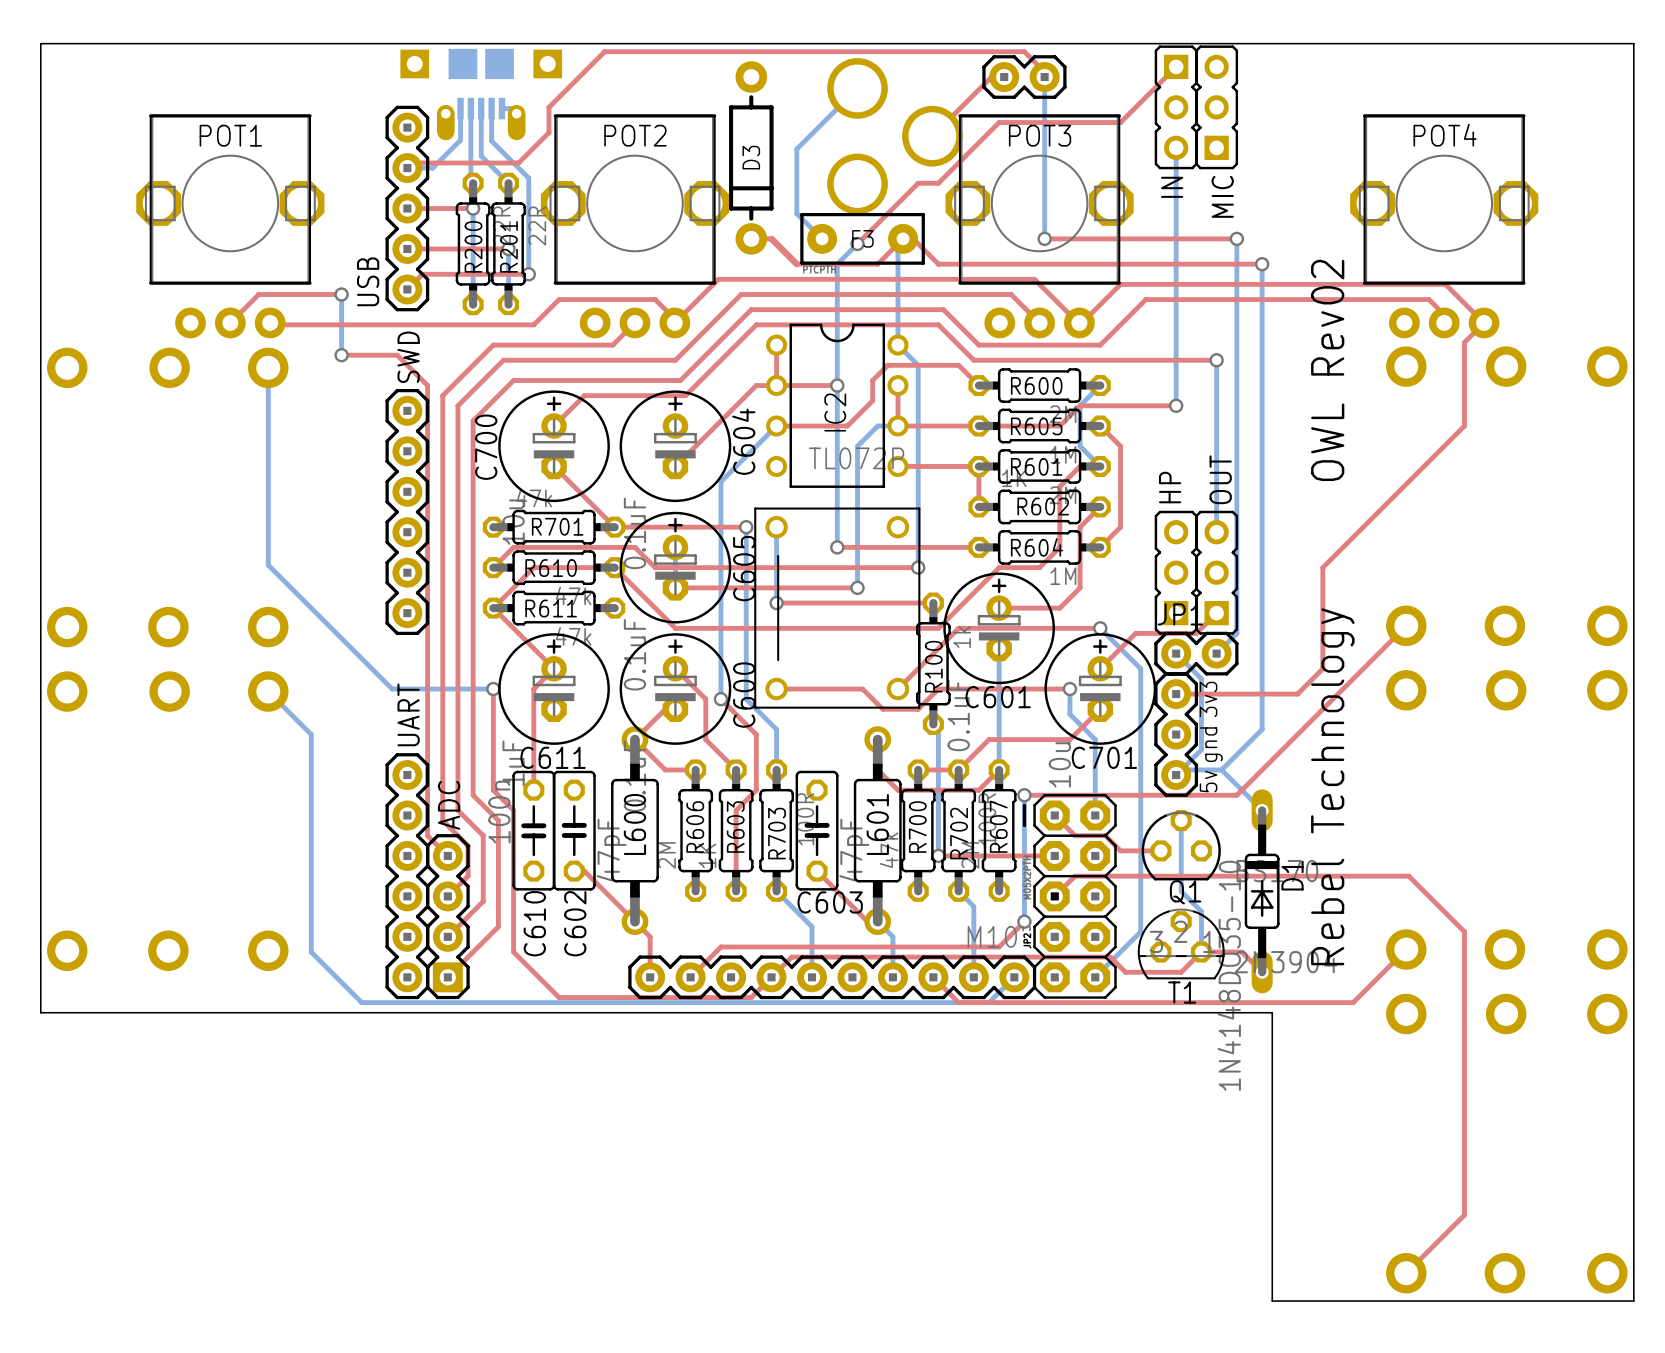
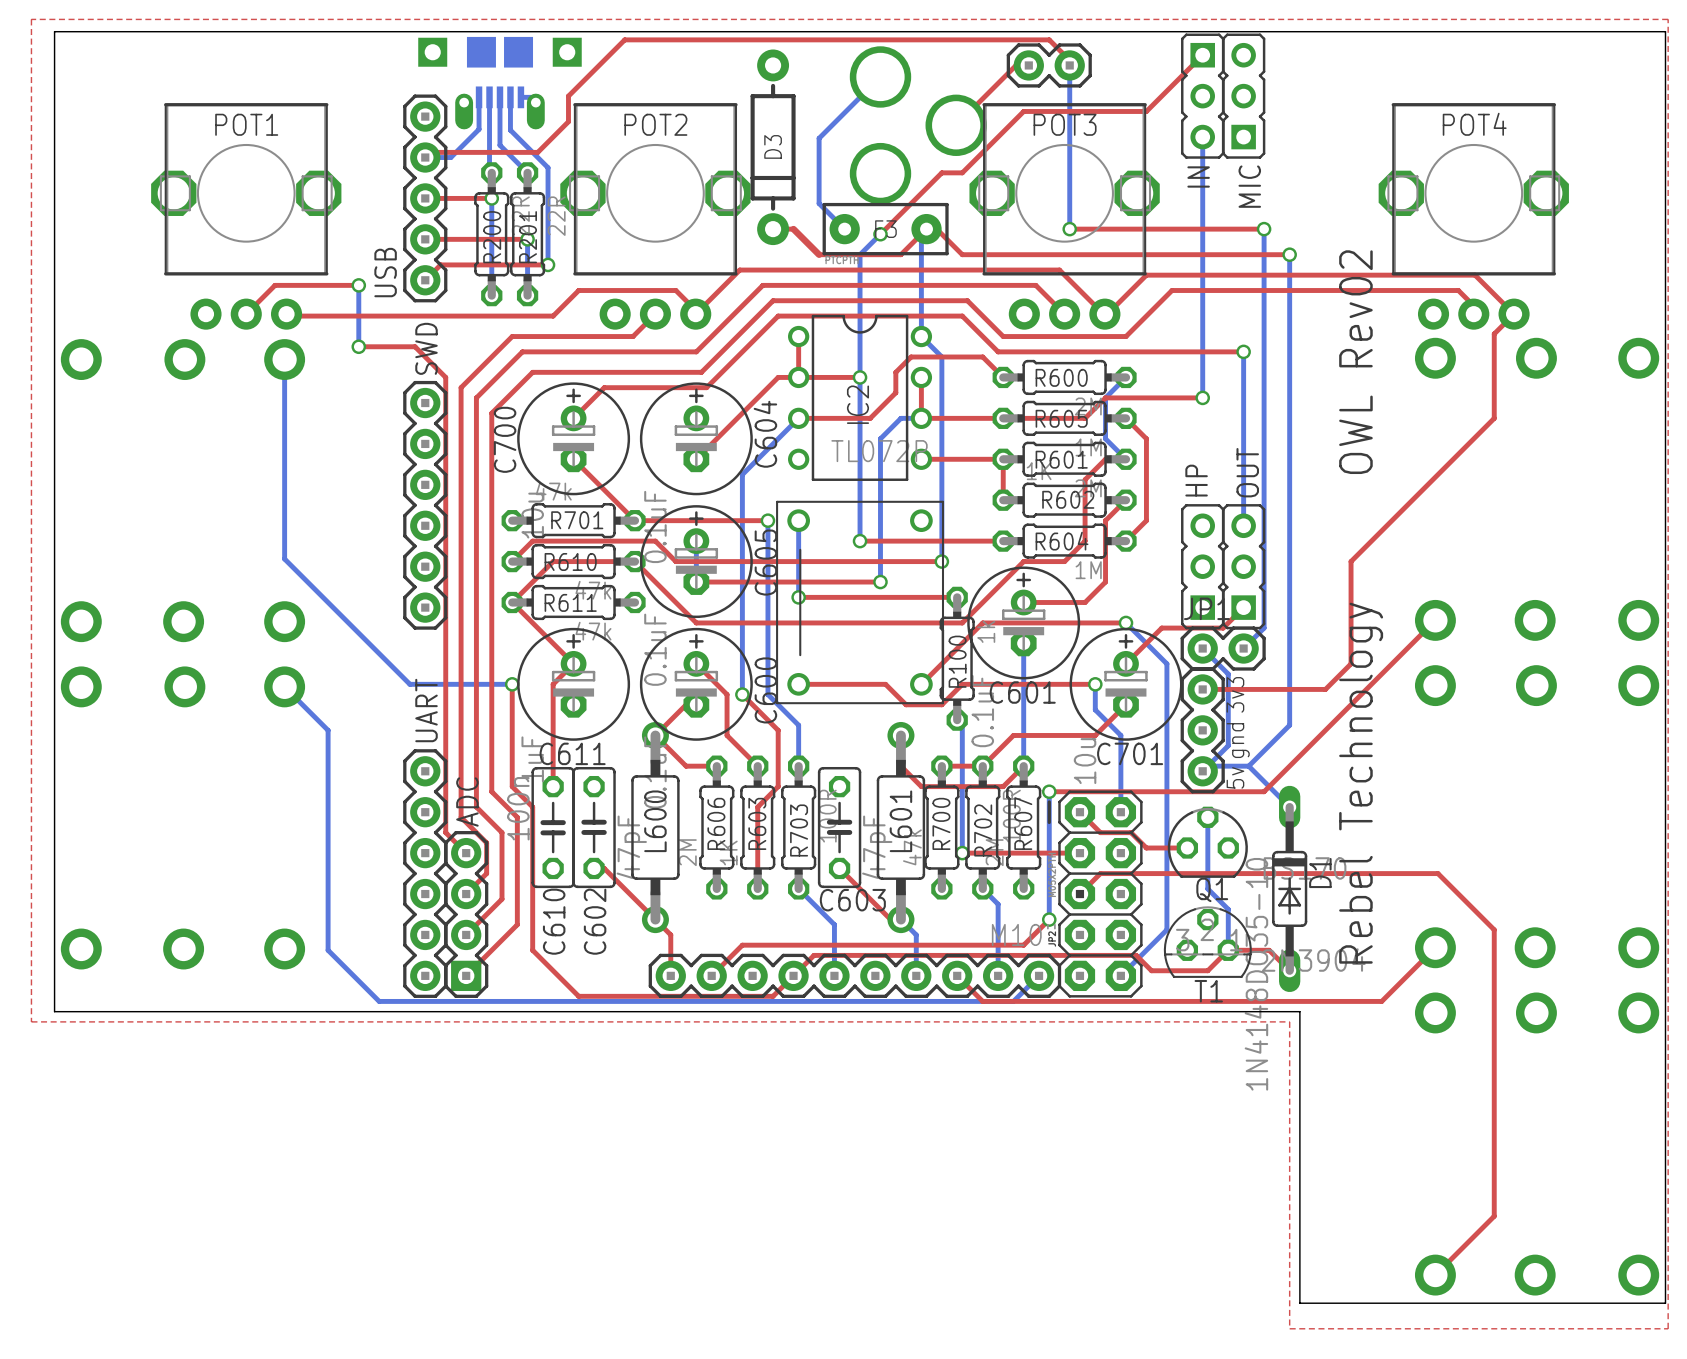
top zone outline: none -> (31, 19) (31, 1021) (1289, 1021) (1289, 1328) (1668, 1328) (1668, 19) (31, 19)

